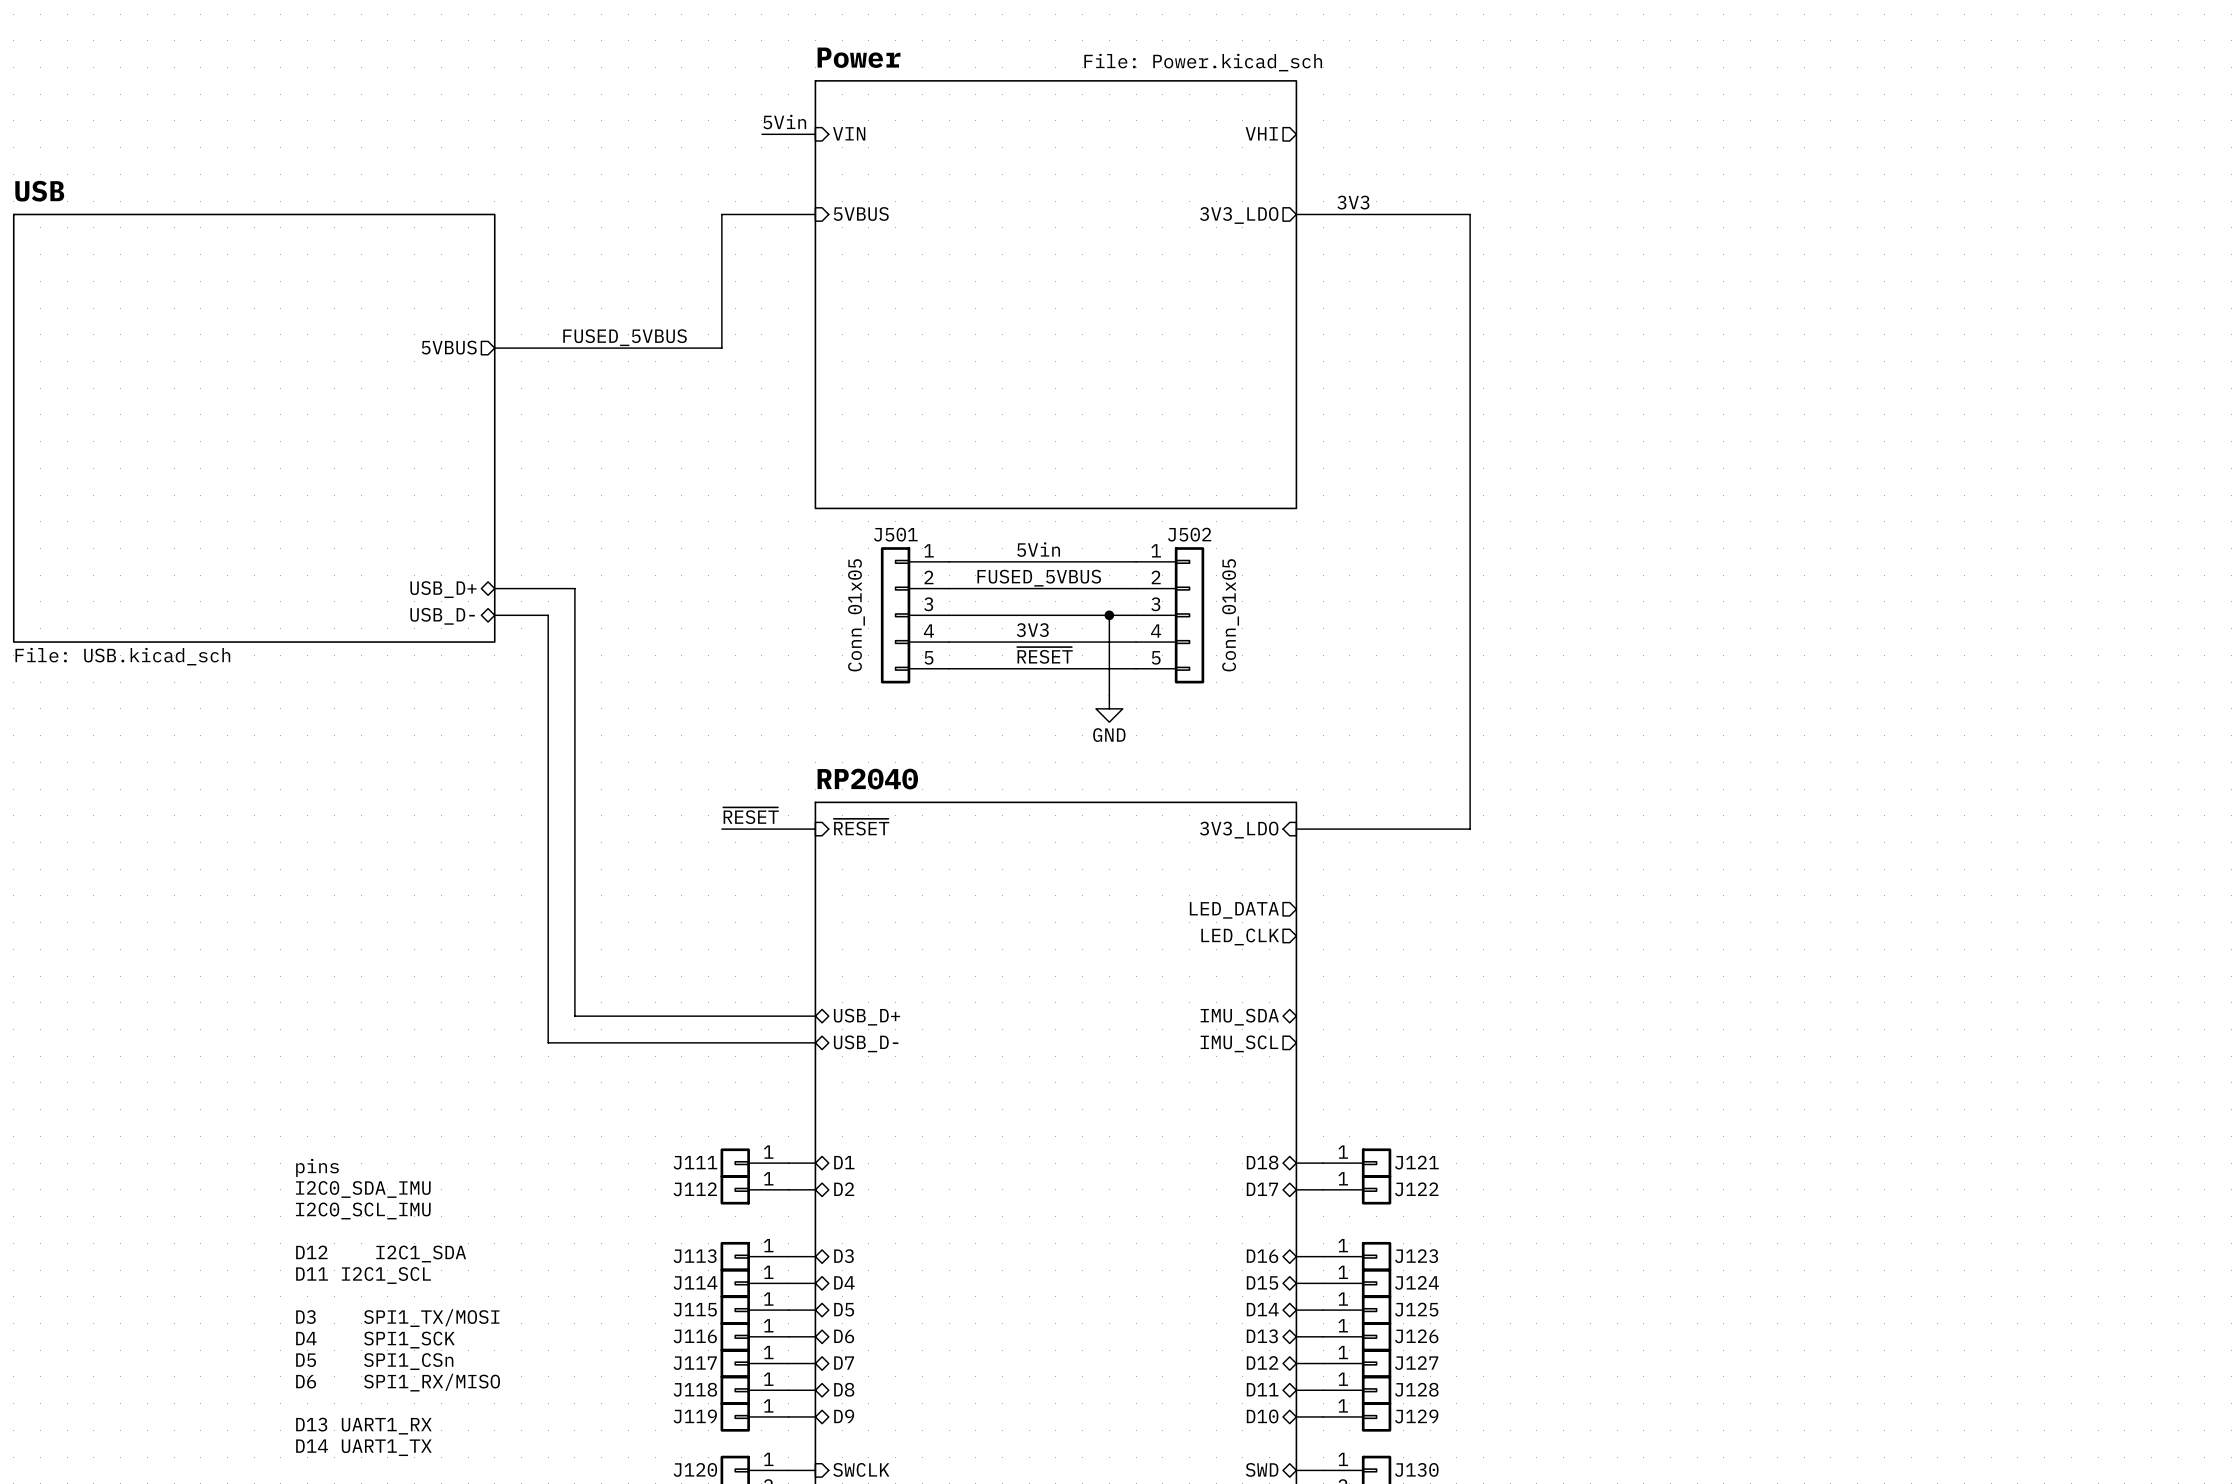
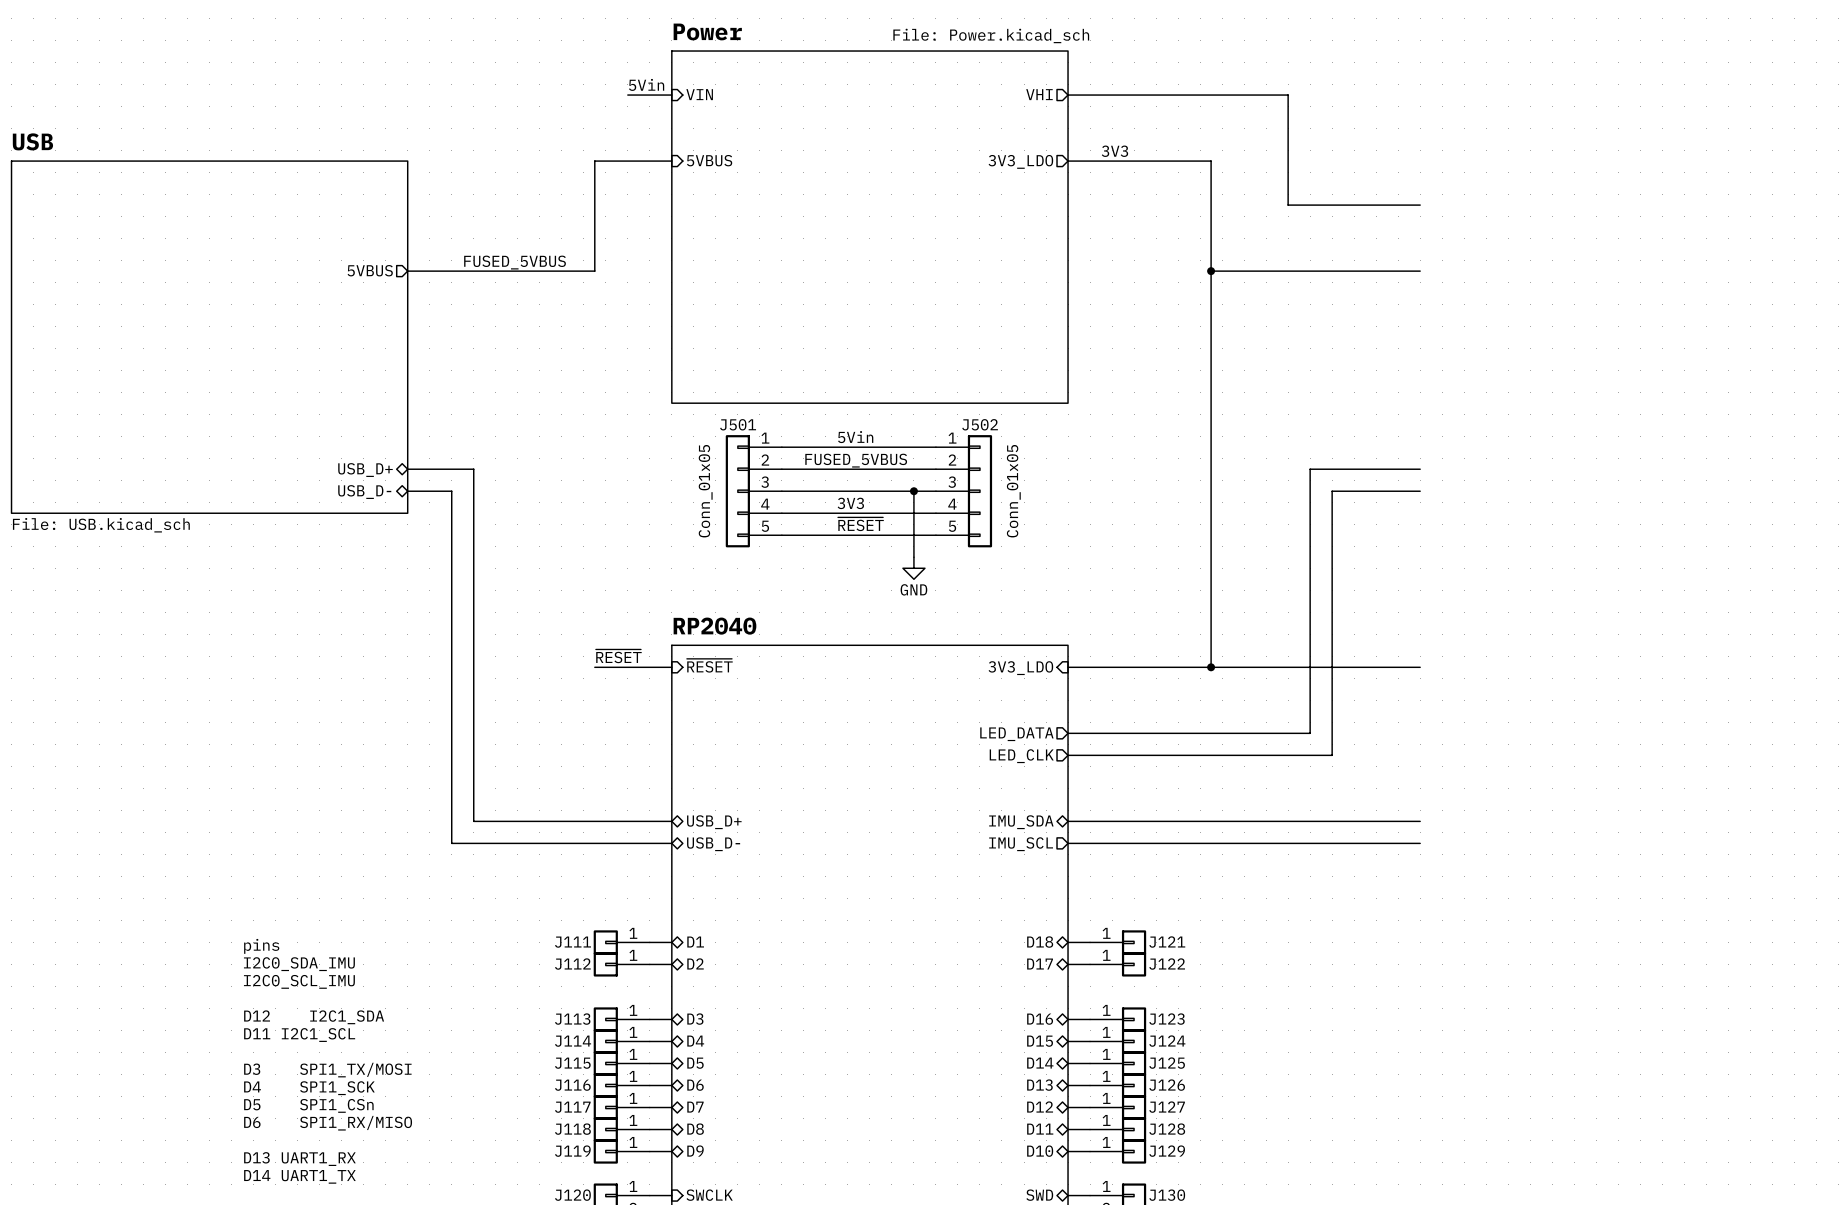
wire: none -> (1068, 95) (1288, 95) (1288, 205) (1420, 205)
wire: none -> (1211, 271) (1420, 271)
junction: none -> (1211, 271)
wire: none -> (1420, 469) (1310, 469) (1310, 733) (1068, 733)
wire: none -> (1420, 491) (1332, 491) (1332, 755) (1068, 755)
wire: none -> (1211, 667) (1420, 667)
junction: none -> (1211, 667)
wire: none -> (1068, 821) (1420, 821)
wire: none -> (1068, 843) (1420, 843)

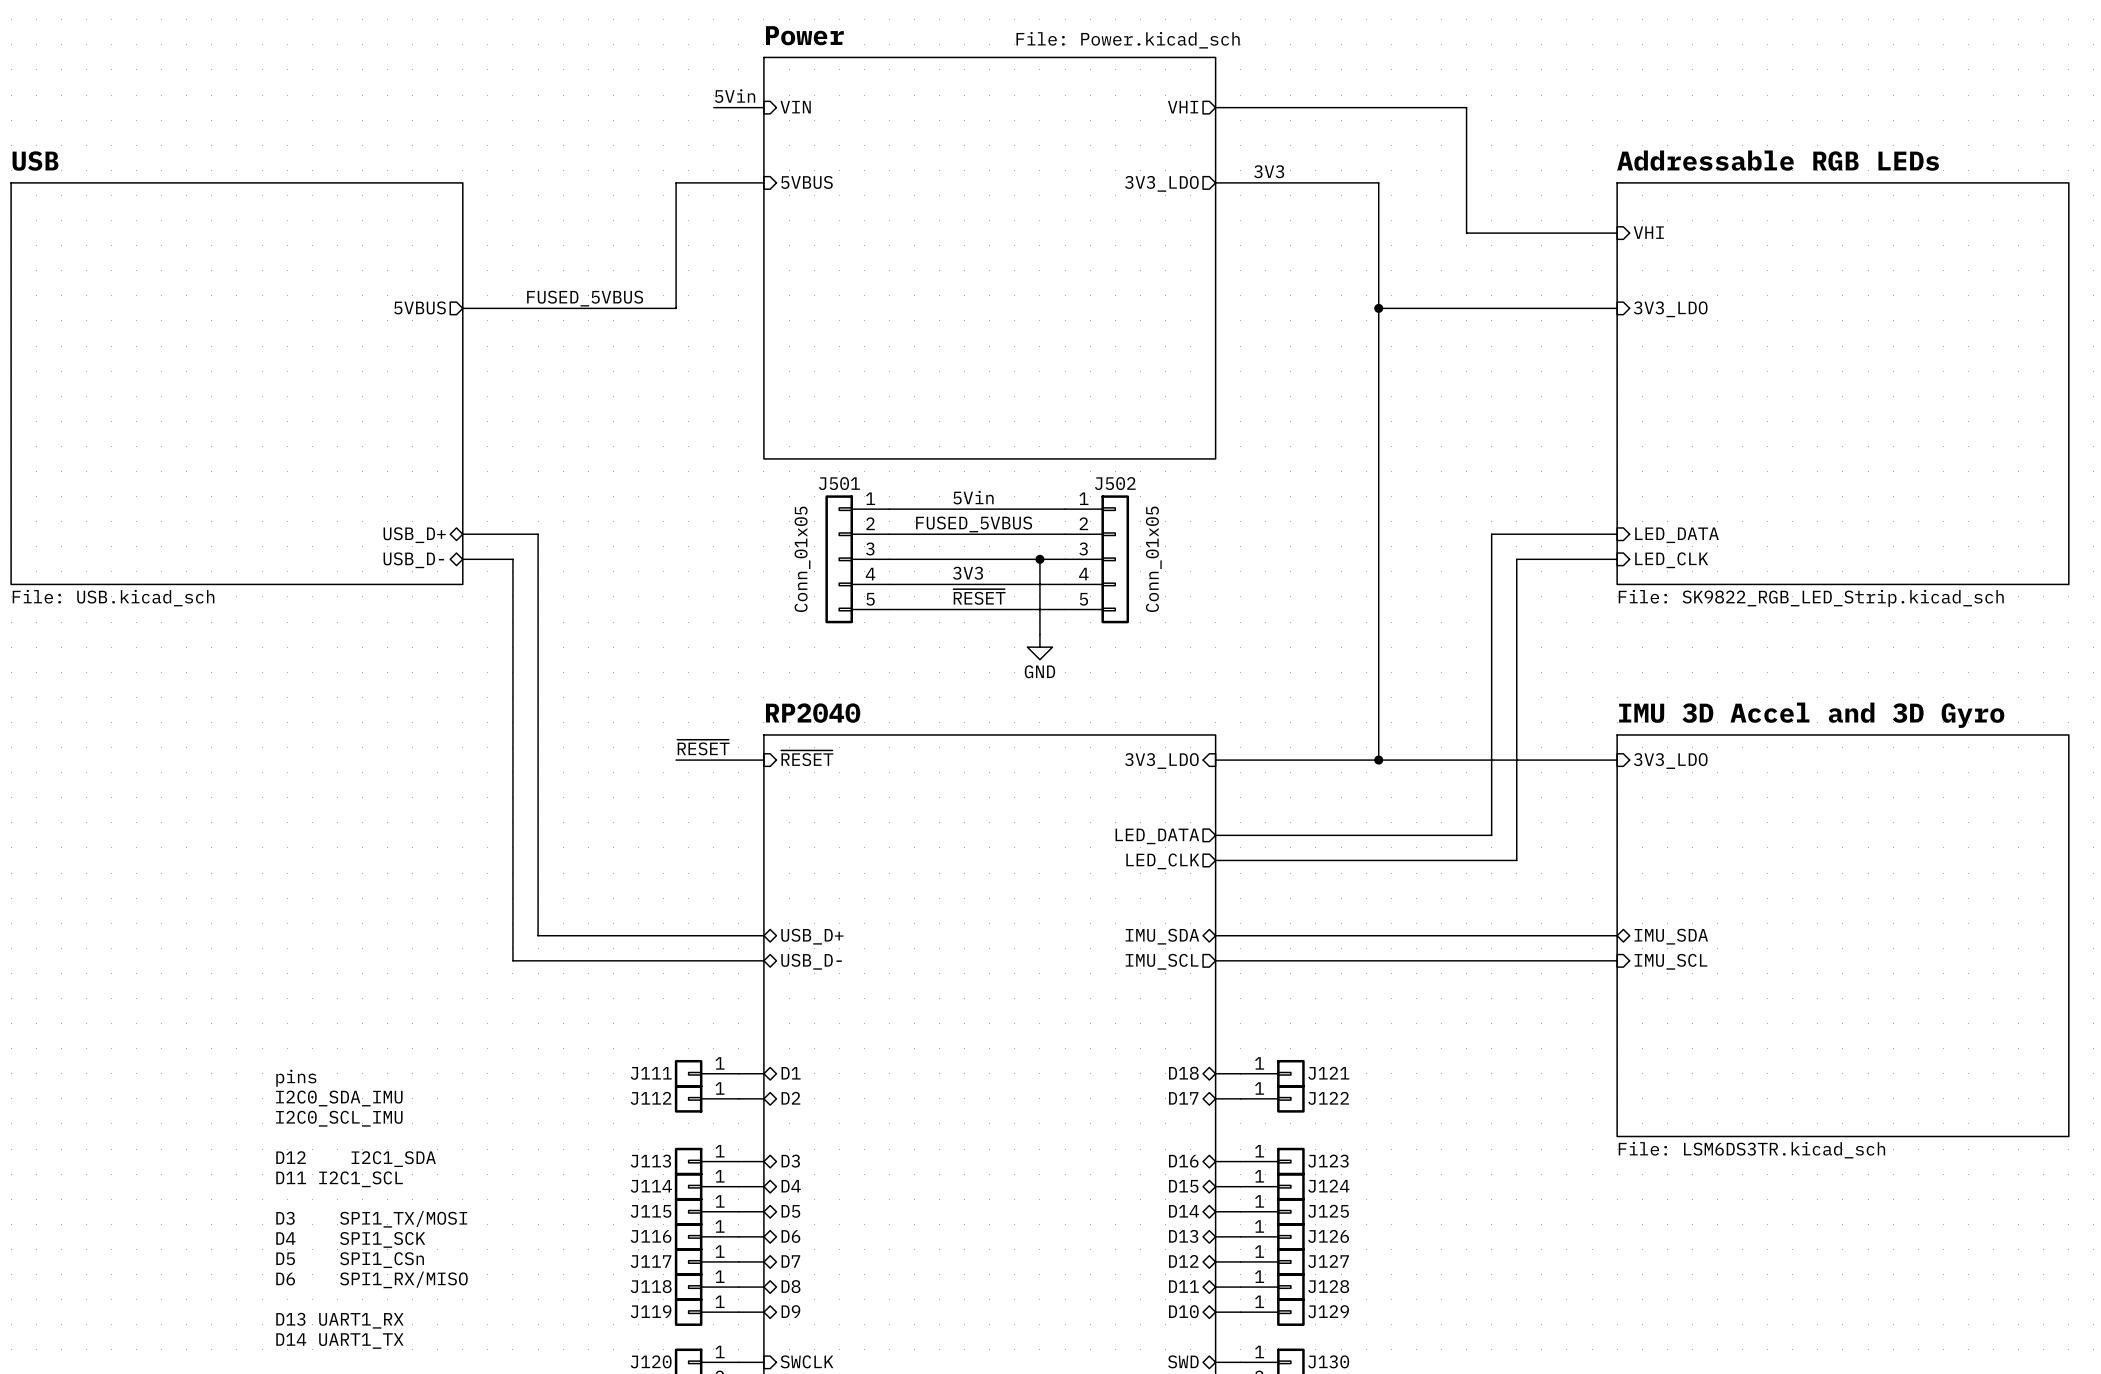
sheet pin: none -> VHI (1648, 232)
sheet pin: none -> 3V3_LDO (1670, 309)
sheet Addressable RGB LEDs: none -> File: SK9822_RGB_LED_Strip.kicad_sch (1842, 383)
sheet pin: none -> LED_DATA (1677, 535)
sheet pin: none -> LED_CLK (1671, 560)
sheet pin: none -> 3V3_LDO (1670, 761)
sheet IMU 3D Accel and 3D Gyro: none -> File: LSM6DS3TR.kicad_sch (1842, 935)
sheet pin: none -> IMU_SDA (1671, 936)
sheet pin: none -> IMU_SCL (1670, 961)

